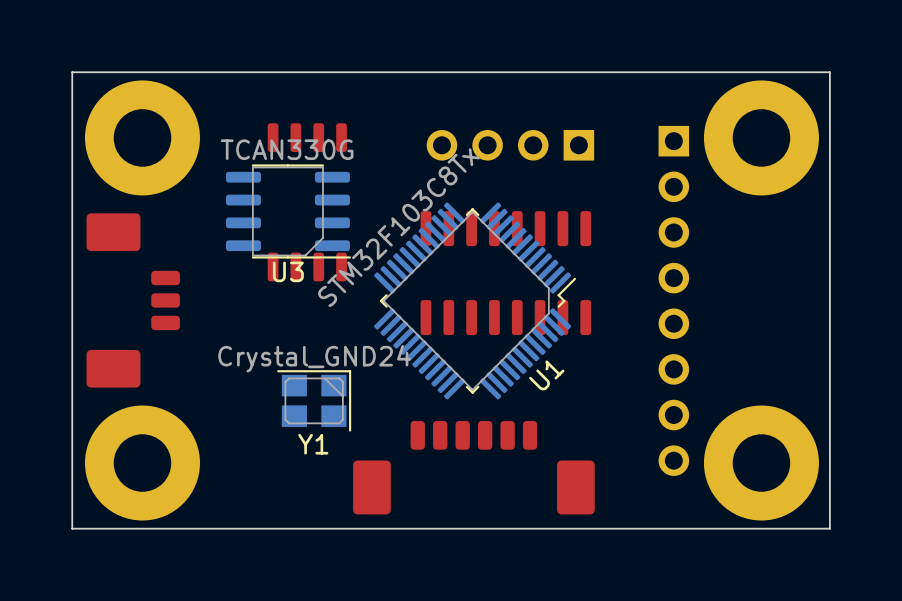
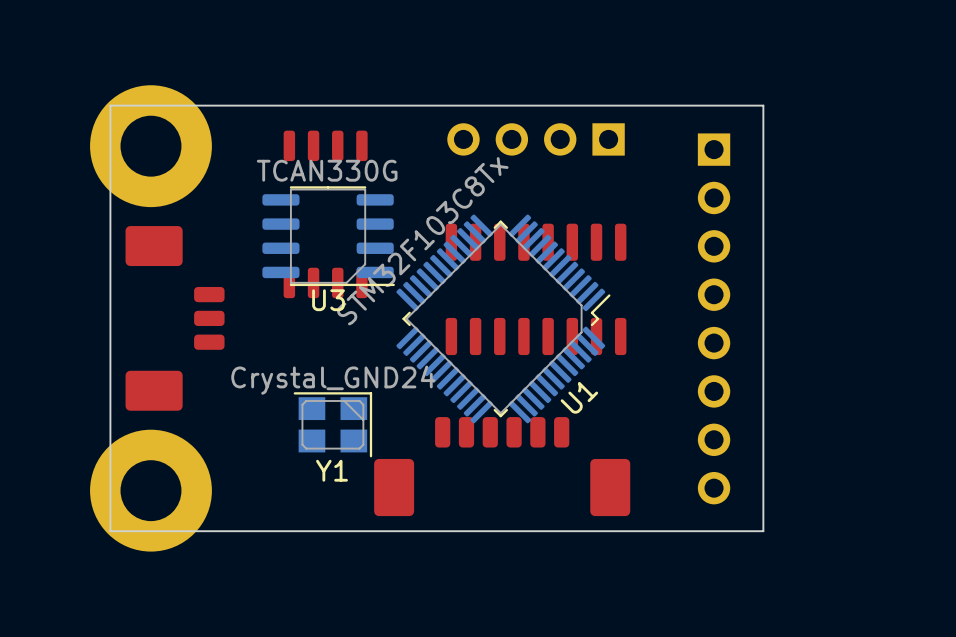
board edge: (829, 72) (829, 528) (72, 528) (72, 72) (829, 72) -> (763, 105) (763, 531) (110, 531) (110, 105) (763, 105)
part: (761, 137) -> none
part position: (510, 145) -> (536, 139)
U3 position: (288, 211) -> (328, 236)
part position: (133, 300) -> (175, 318)
part: (761, 463) -> none
part position: (473, 467) -> (502, 466)

